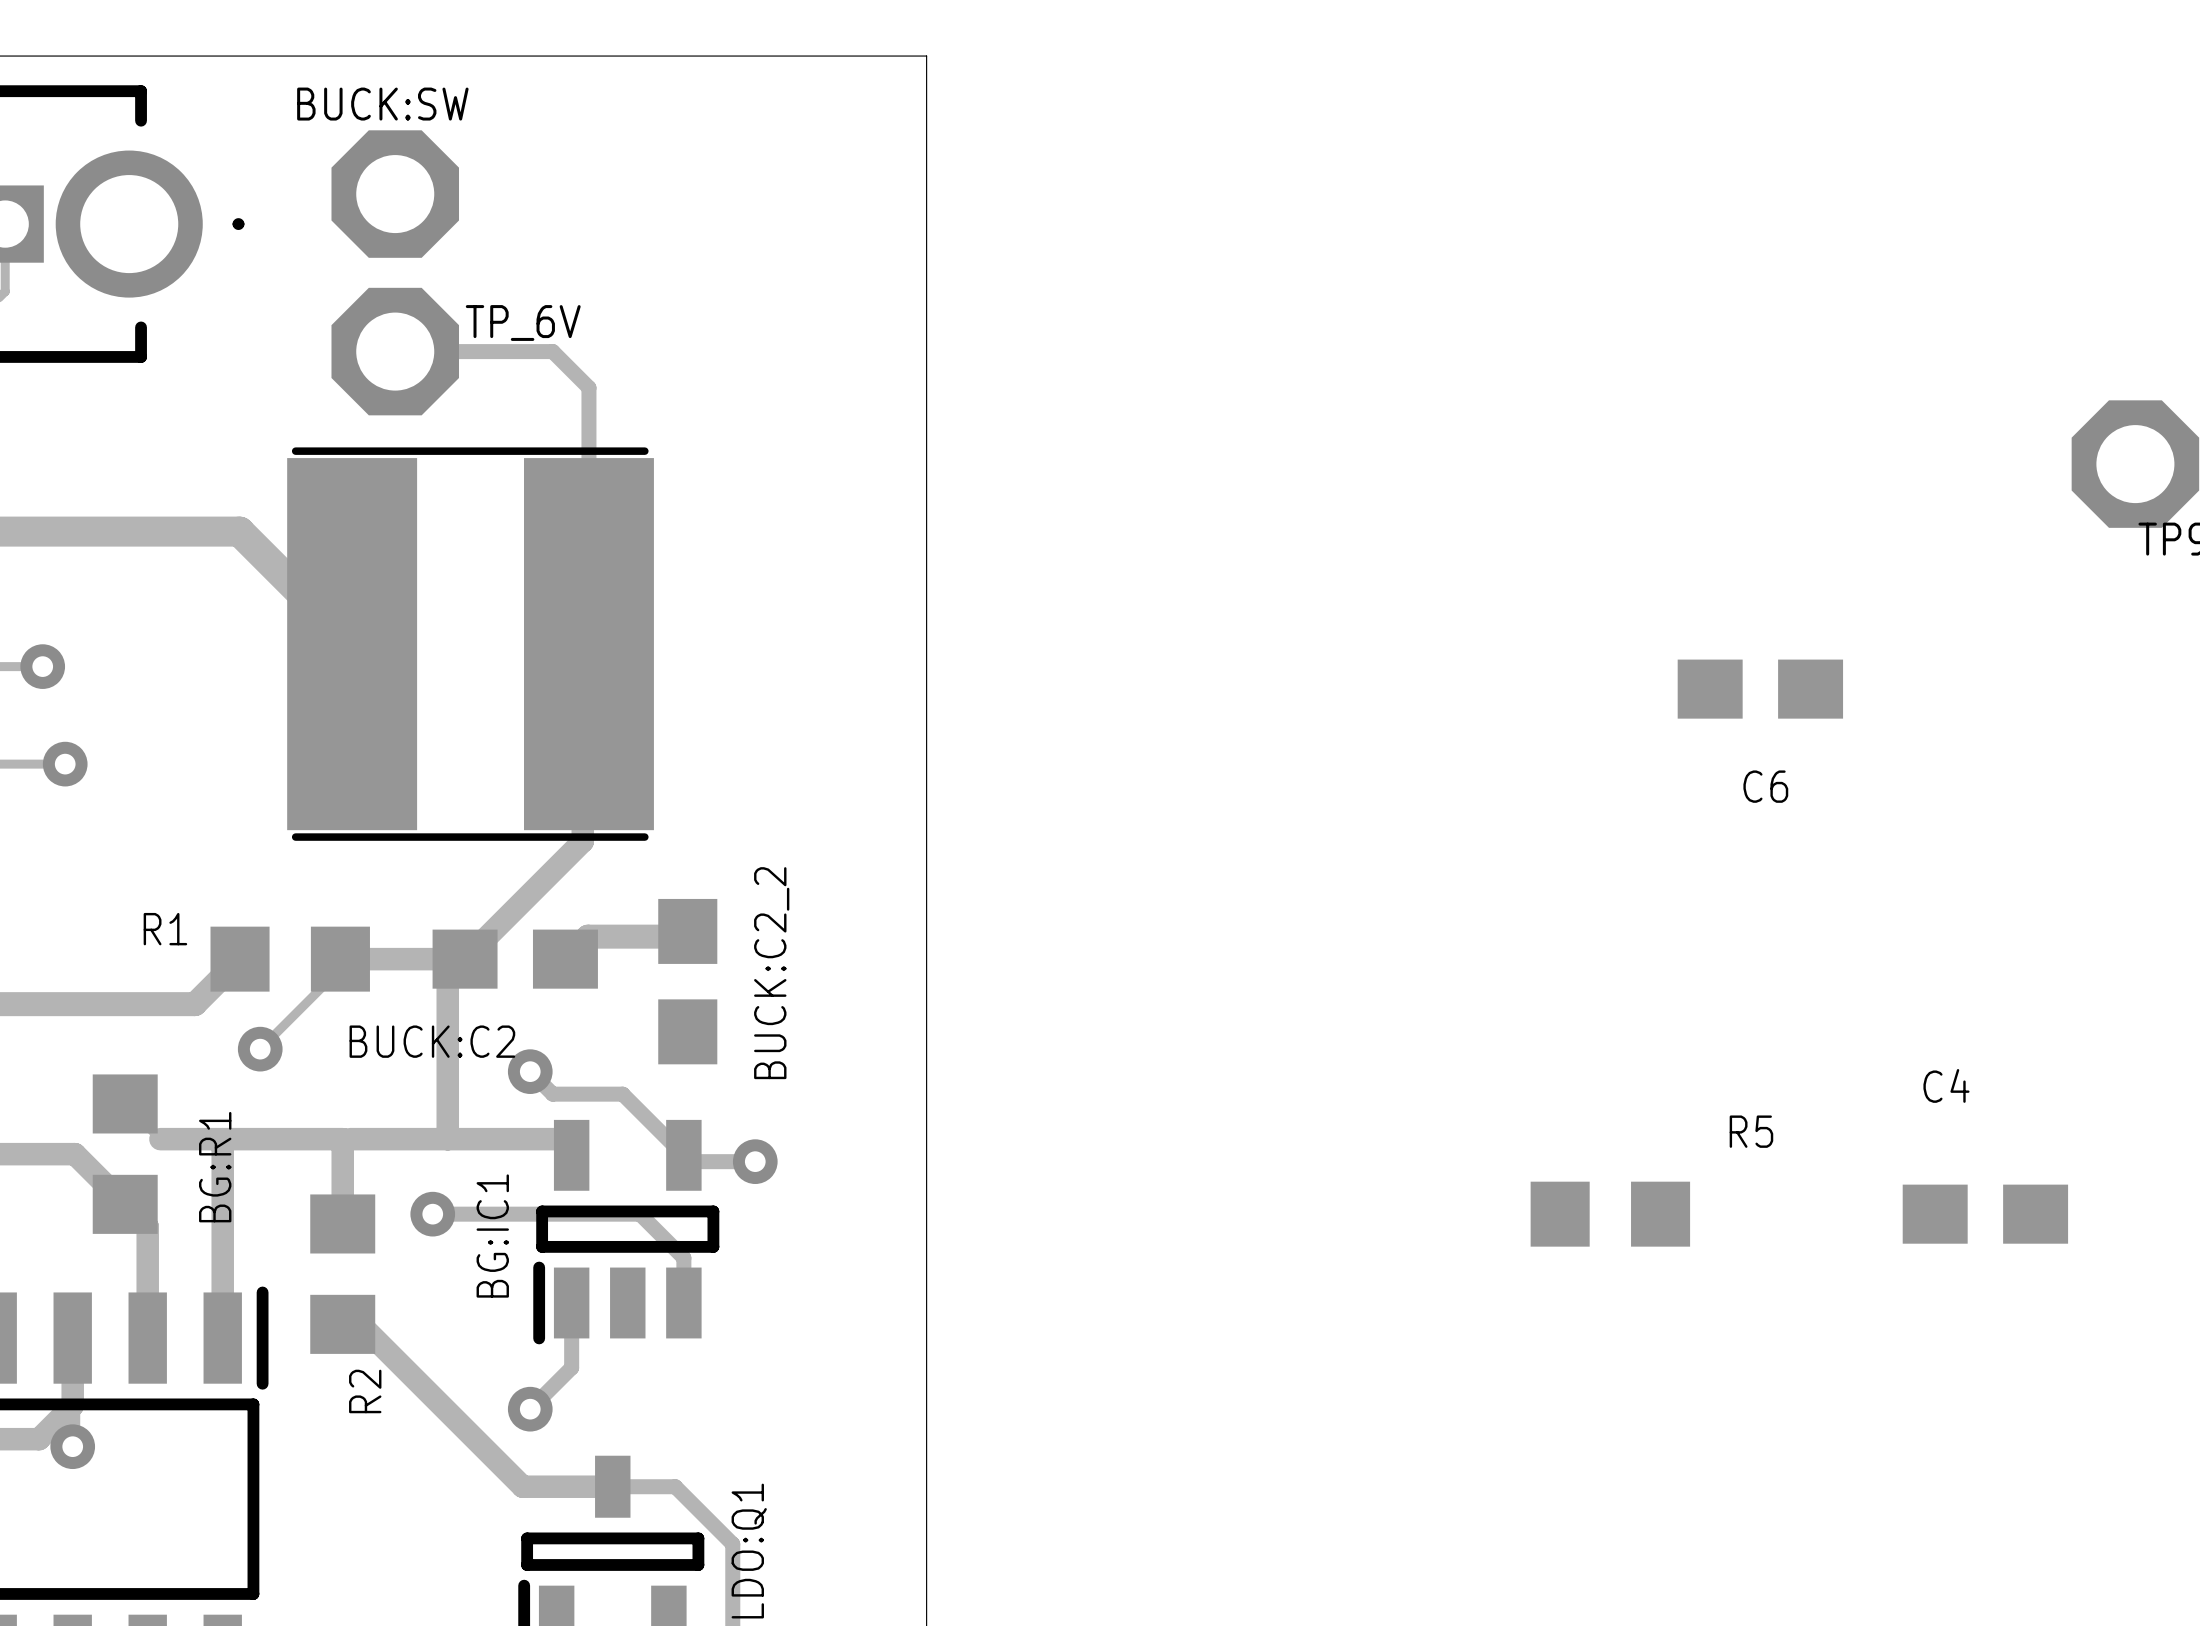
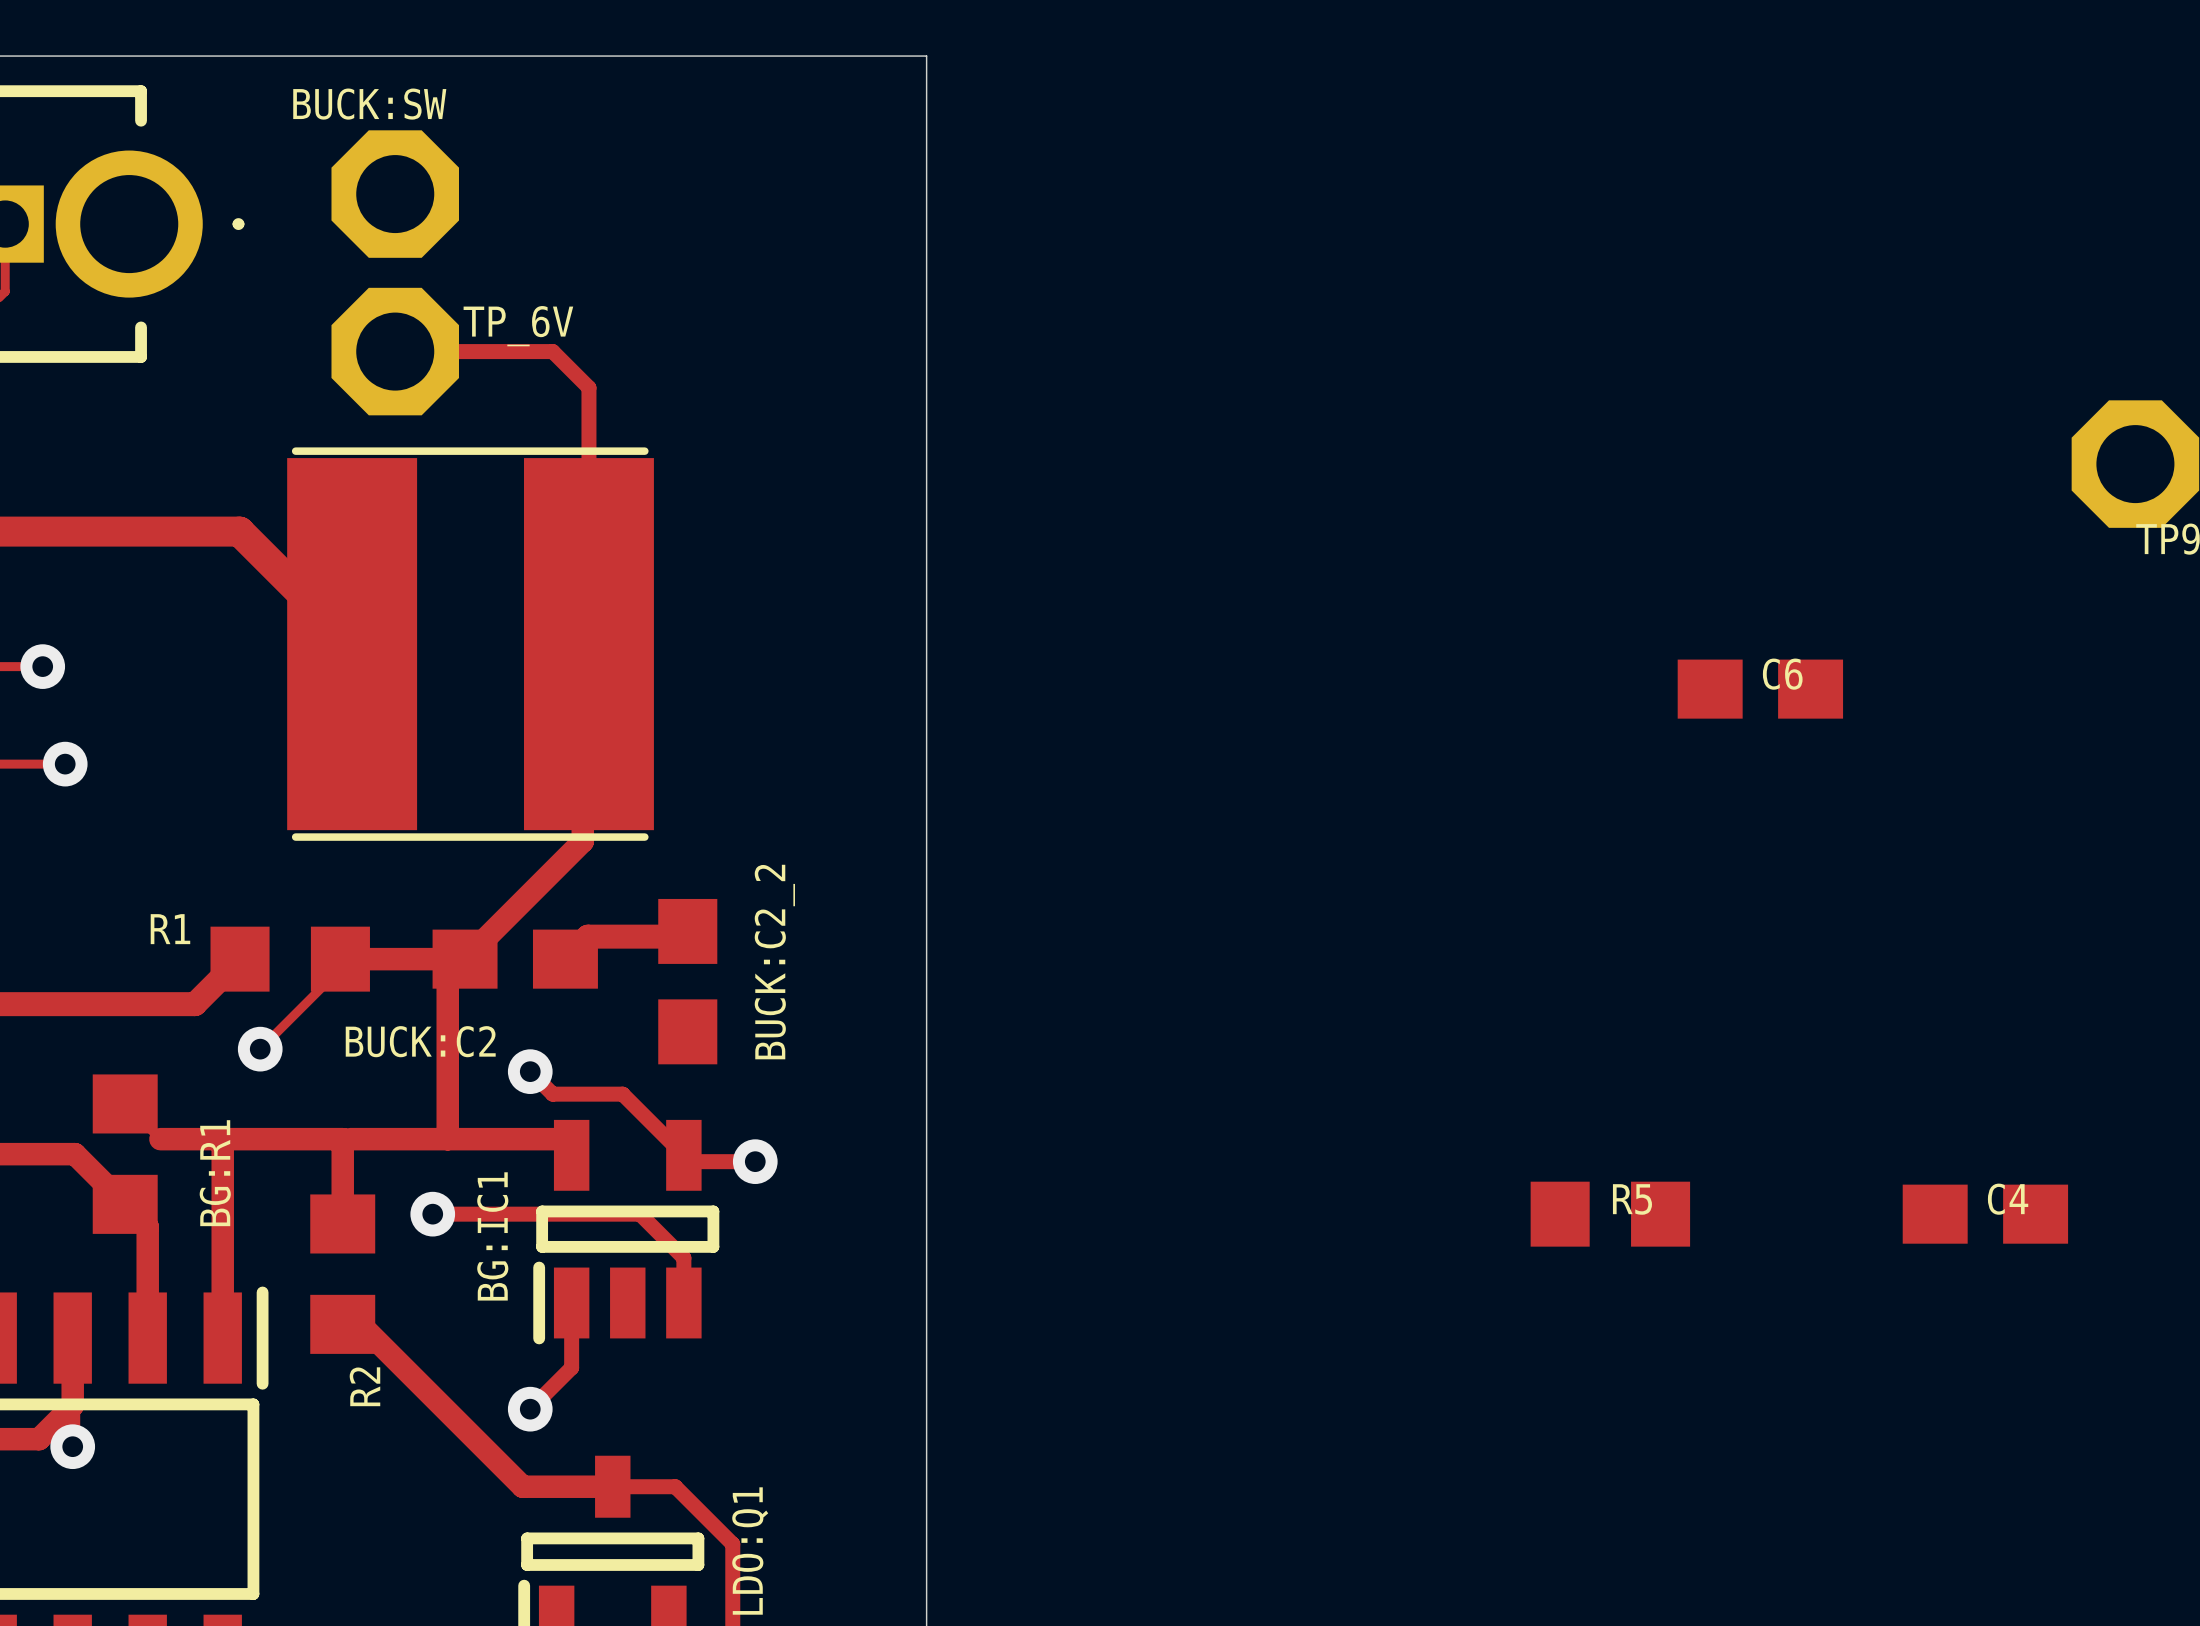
C6 name position: C6 (1765, 786) -> C6 (1782, 674)
C4 name position: C4 (1946, 1085) -> C4 (2008, 1199)
R5 name position: R5 (1751, 1131) -> R5 (1632, 1199)

